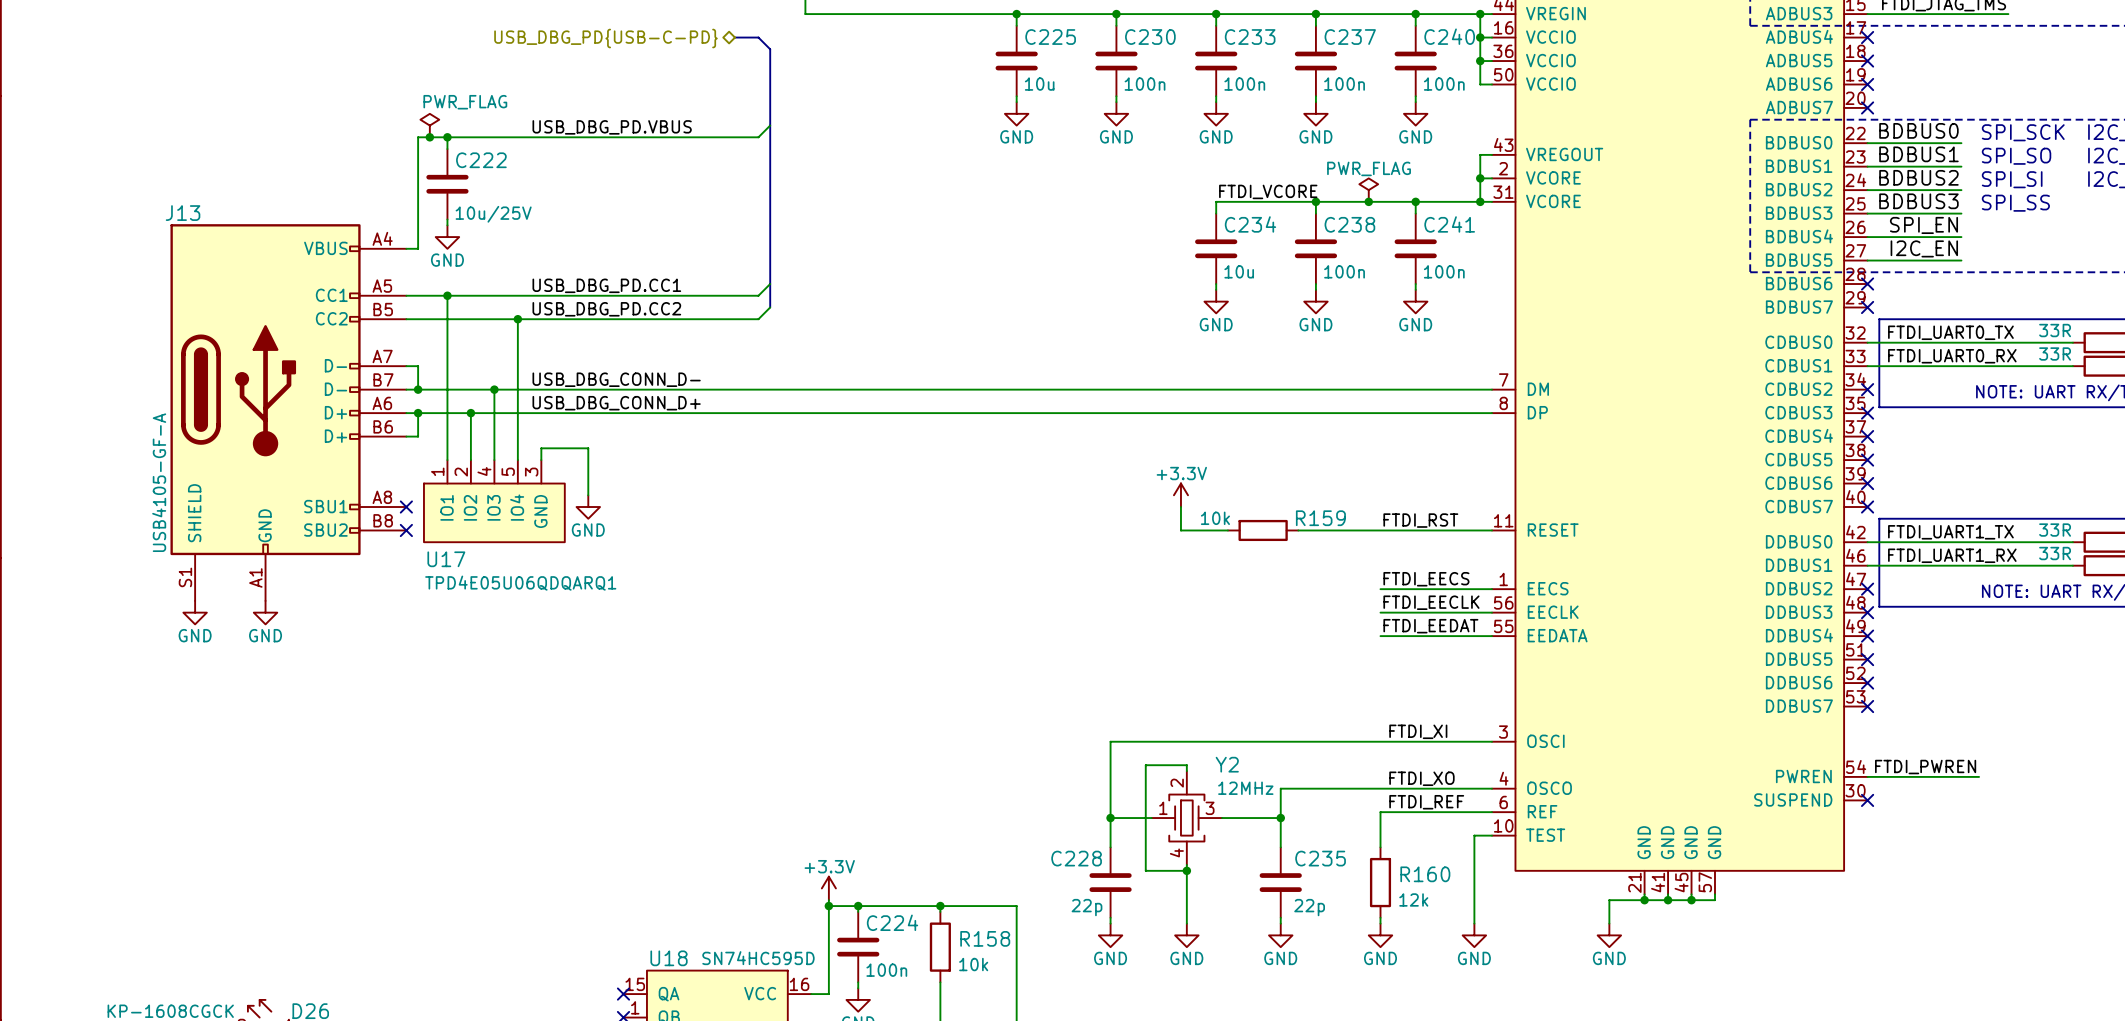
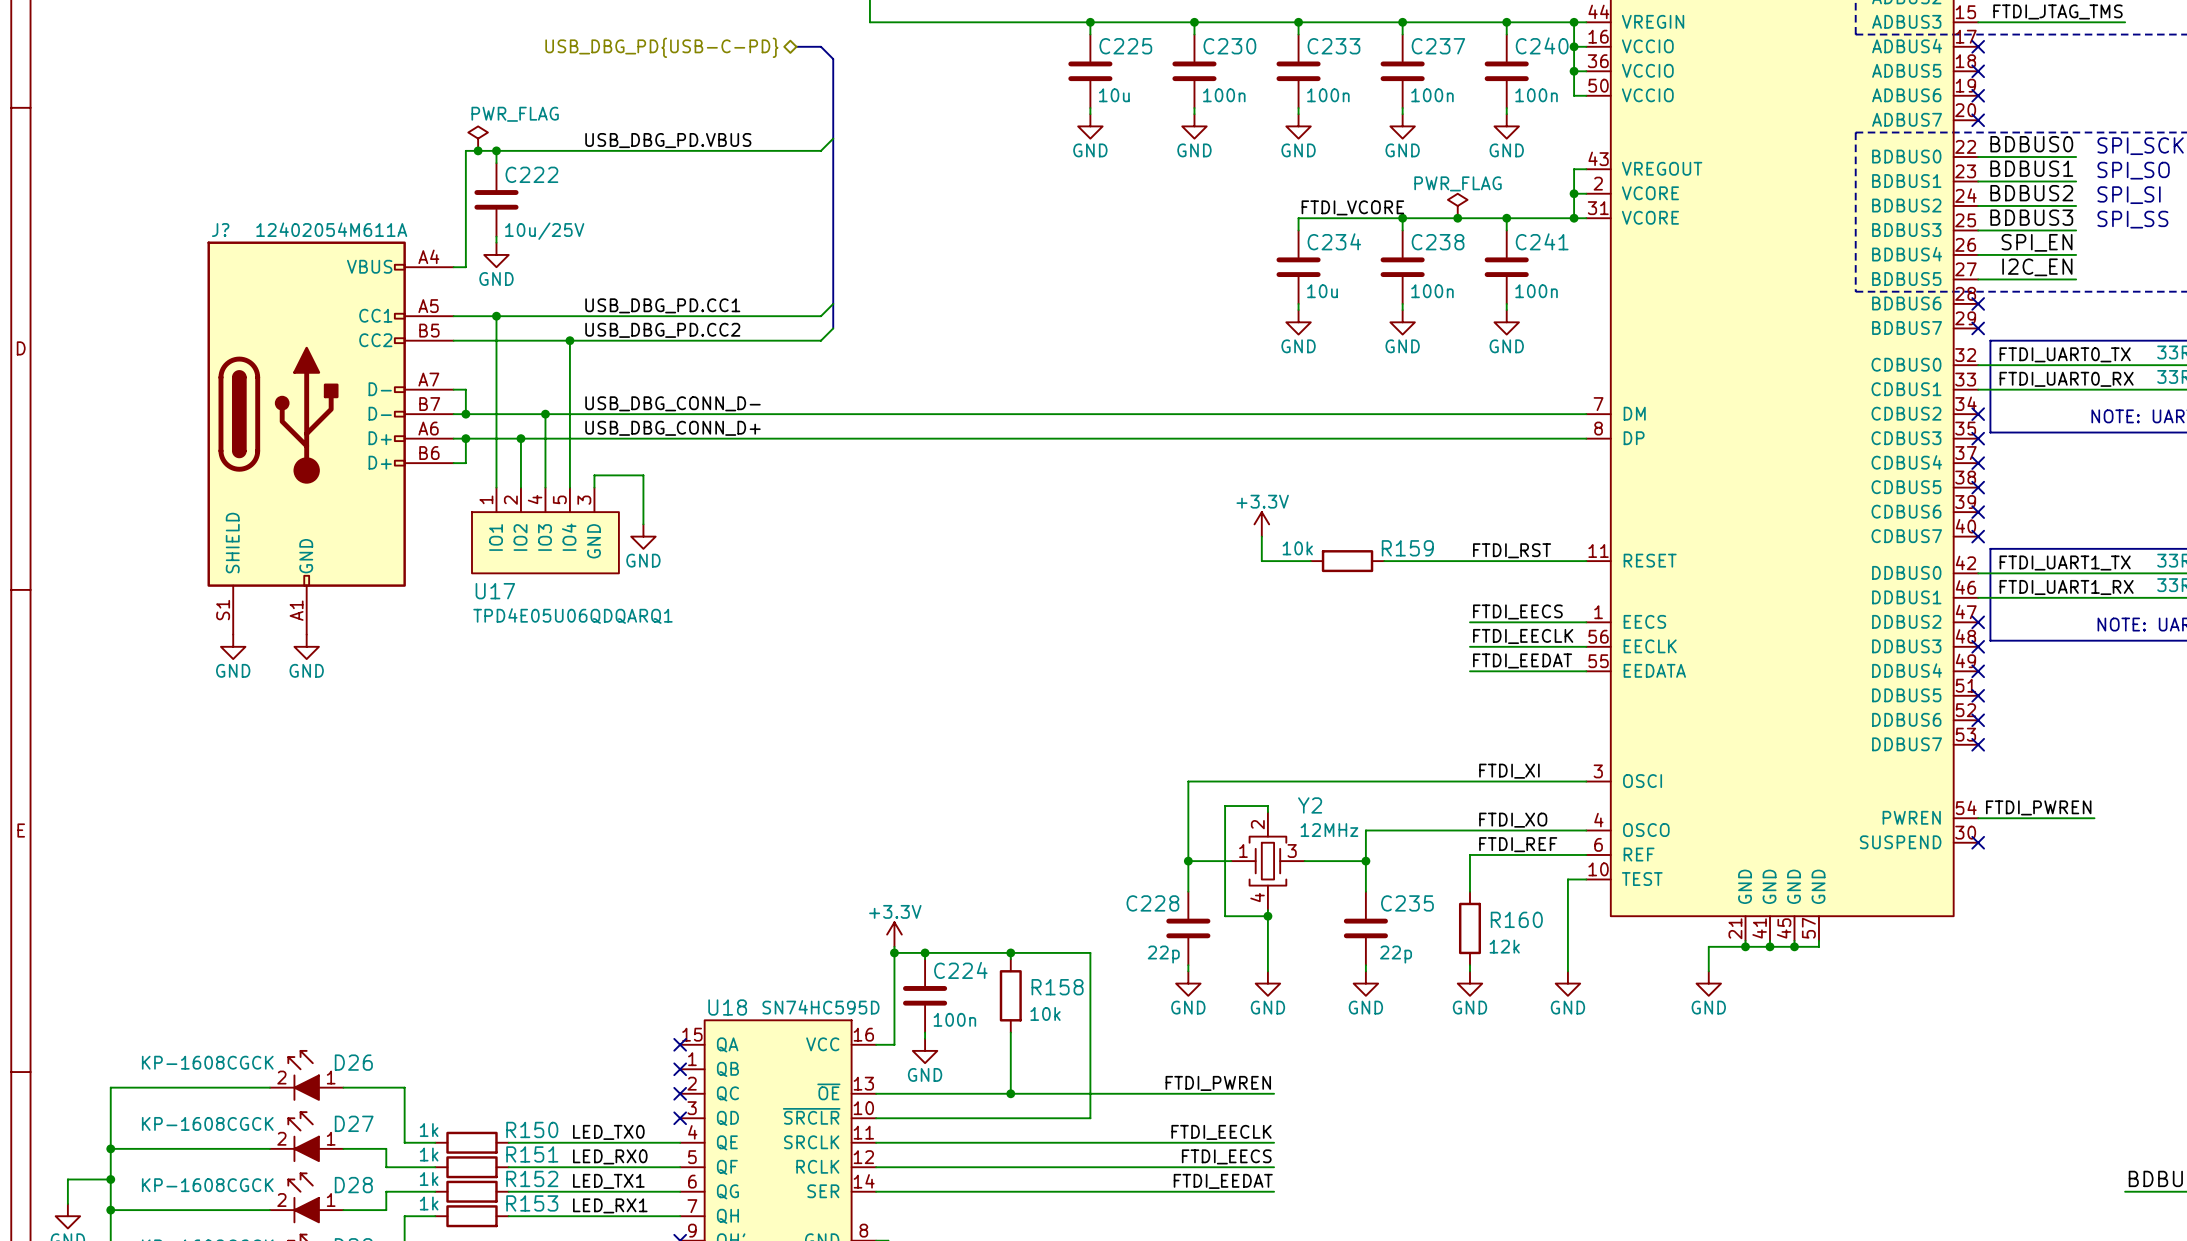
J13: USB4105-GF-A (288, 412) -> none
J?: none -> 12402054M611A (330, 438)
no-connect mark: (406, 507) -> none
no-connect mark: (406, 530) -> none

